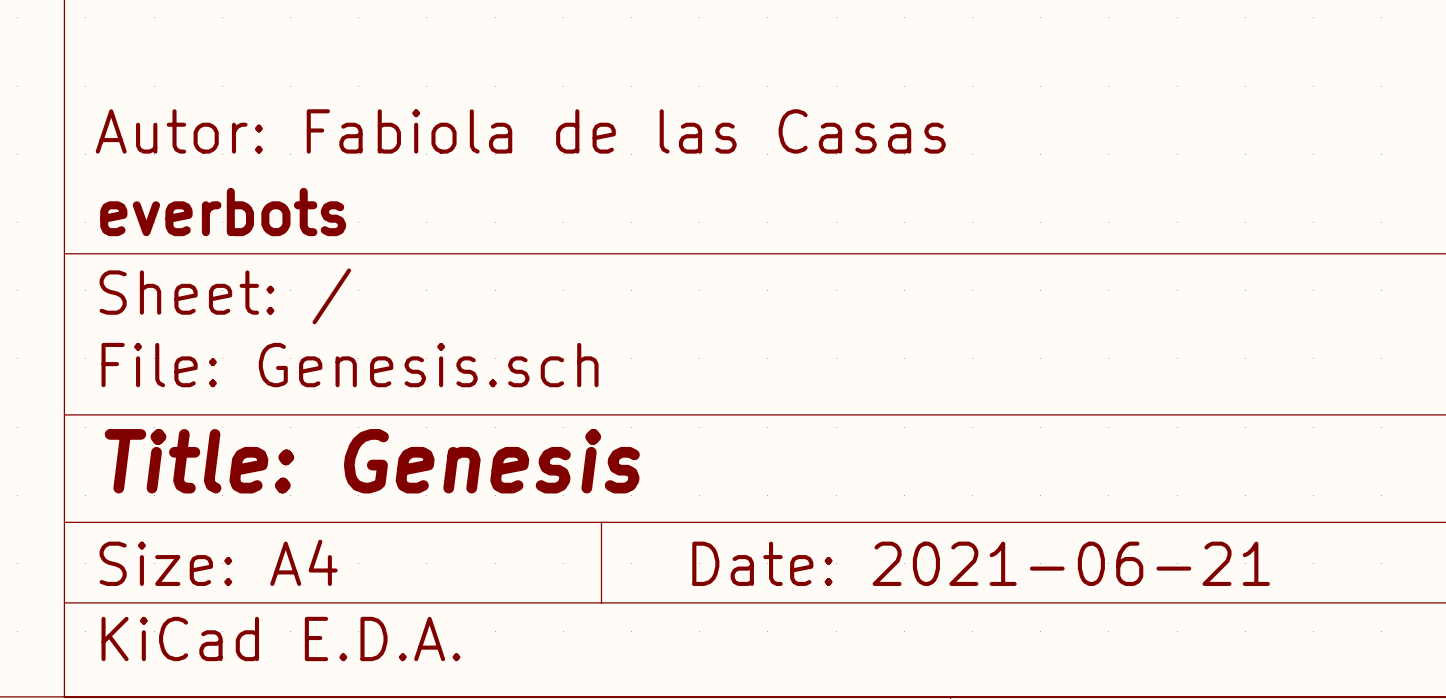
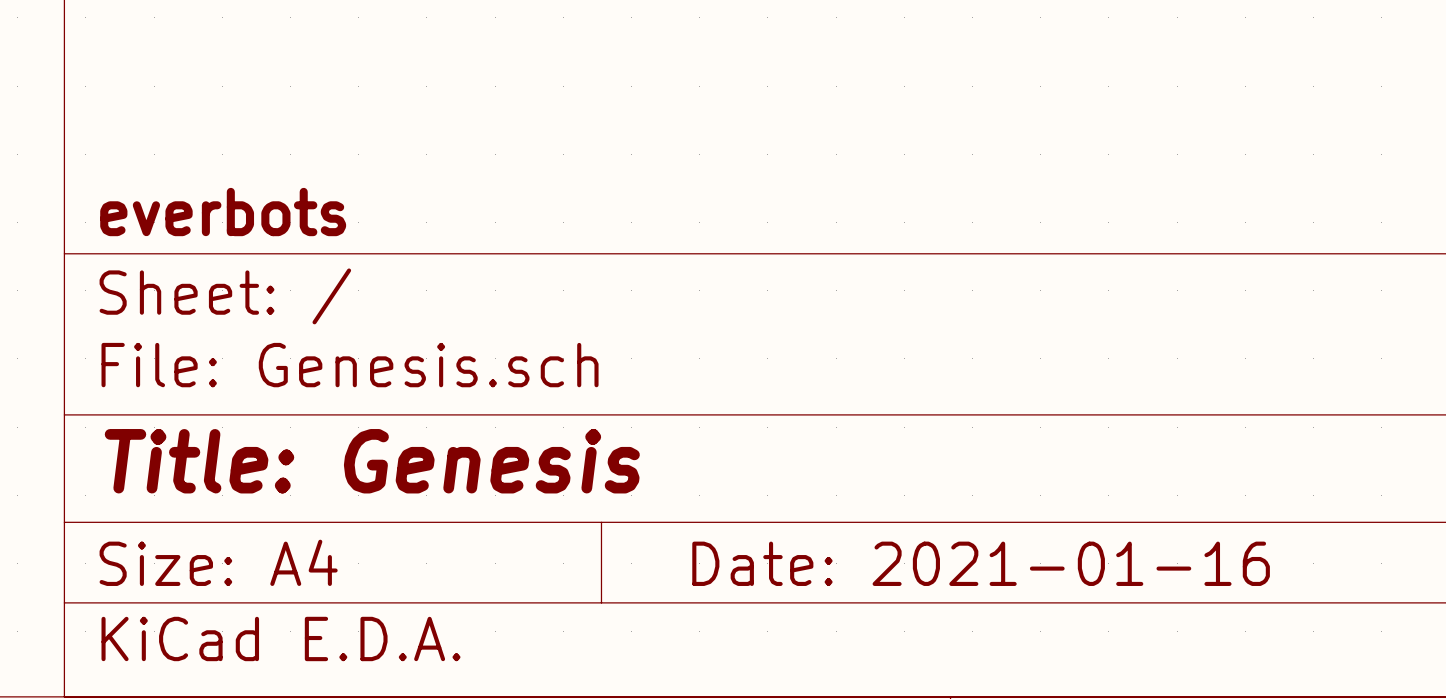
title block: Autor: Fabiola de las Casas (520, 131) -> none
title block: Date: 2021-06-21 (981, 563) -> Date: 2021-01-16 (981, 563)

